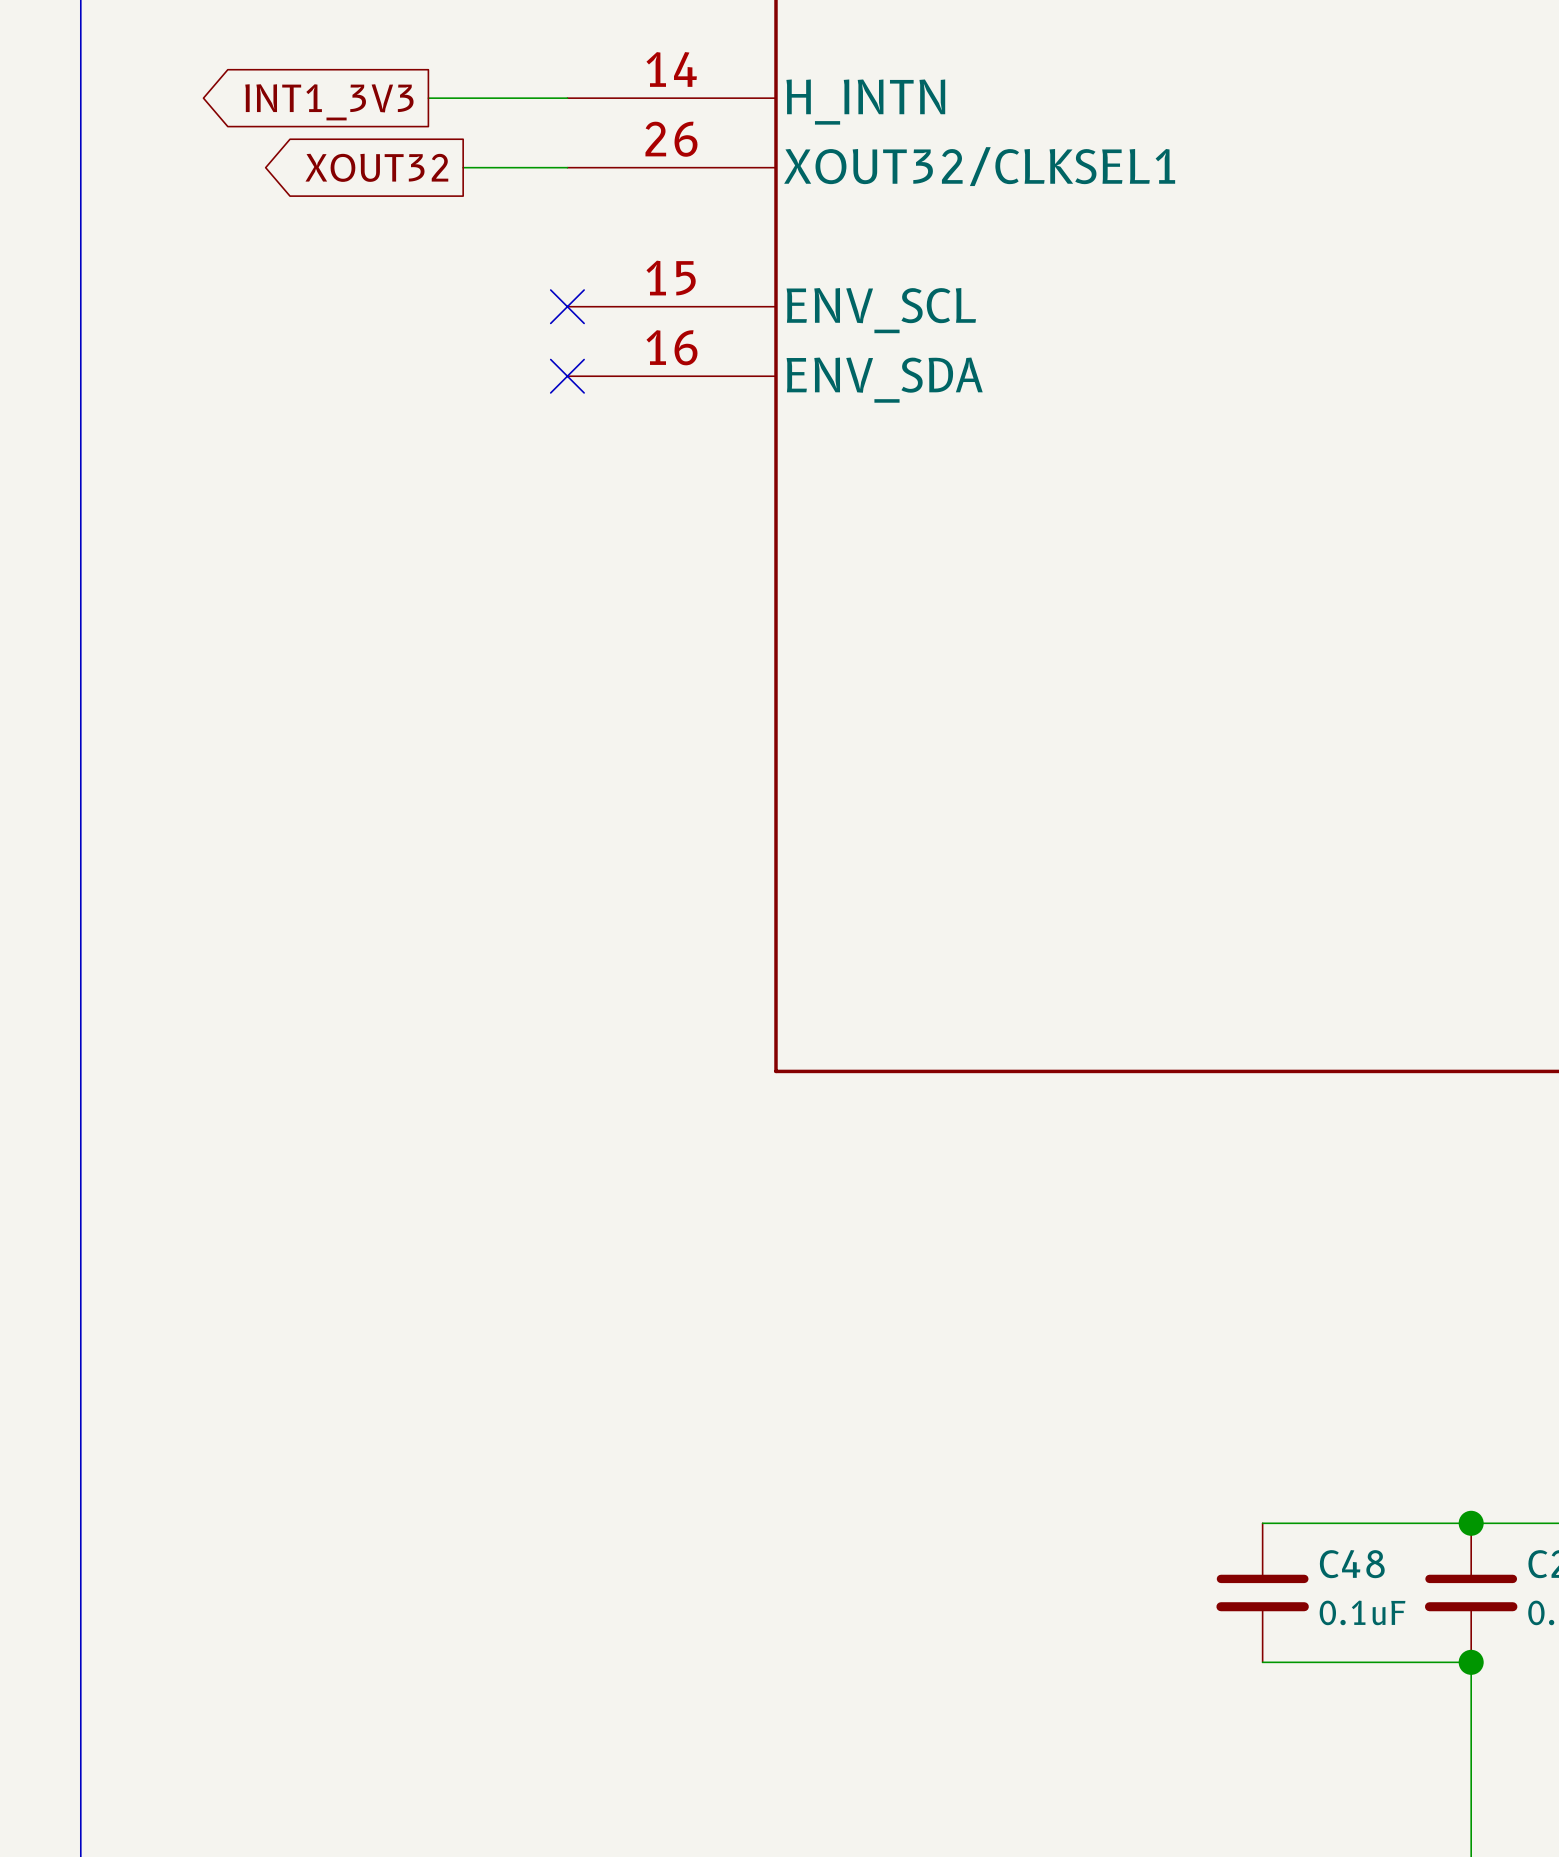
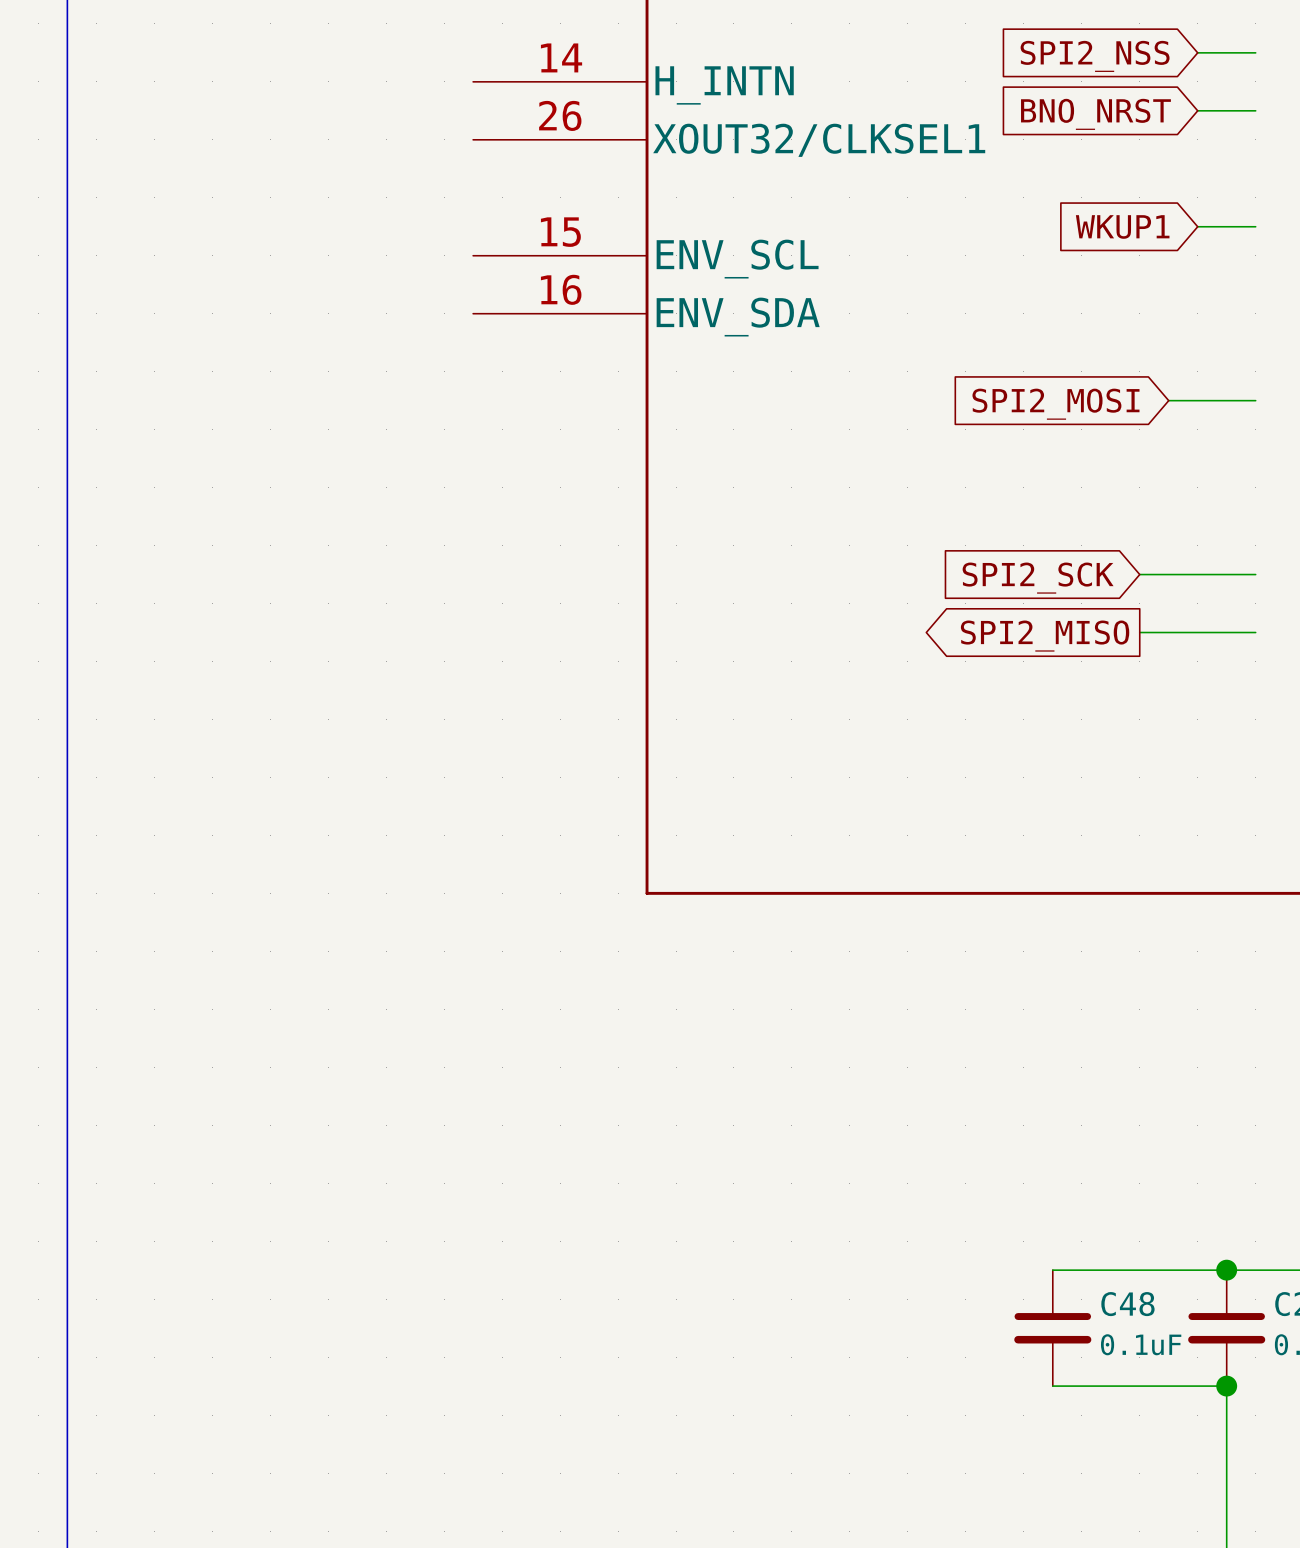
wire: none -> (1197, 52) (1255, 52)
global label: none -> SPI2_NSS (1095, 56)
wire: (428, 98) (567, 98) -> none
global label: INT1_3V3 (329, 102) -> none
wire: none -> (1197, 110) (1255, 110)
global label: none -> BNO_NRST (1095, 114)
global label: XOUT32 (376, 167) -> none
wire: (463, 167) (567, 167) -> none
wire: none -> (1197, 226) (1255, 226)
global label: none -> WKUP1 (1122, 226)
no-connect mark: (567, 306) -> none
no-connect mark: (567, 376) -> none
wire: none -> (1168, 400) (1255, 400)
global label: none -> SPI2_MOSI (1055, 404)
wire: none -> (1139, 574) (1255, 574)
global label: none -> SPI2_SCK (1038, 578)
wire: none -> (1139, 632) (1255, 632)
global label: none -> SPI2_MISO (1045, 636)

